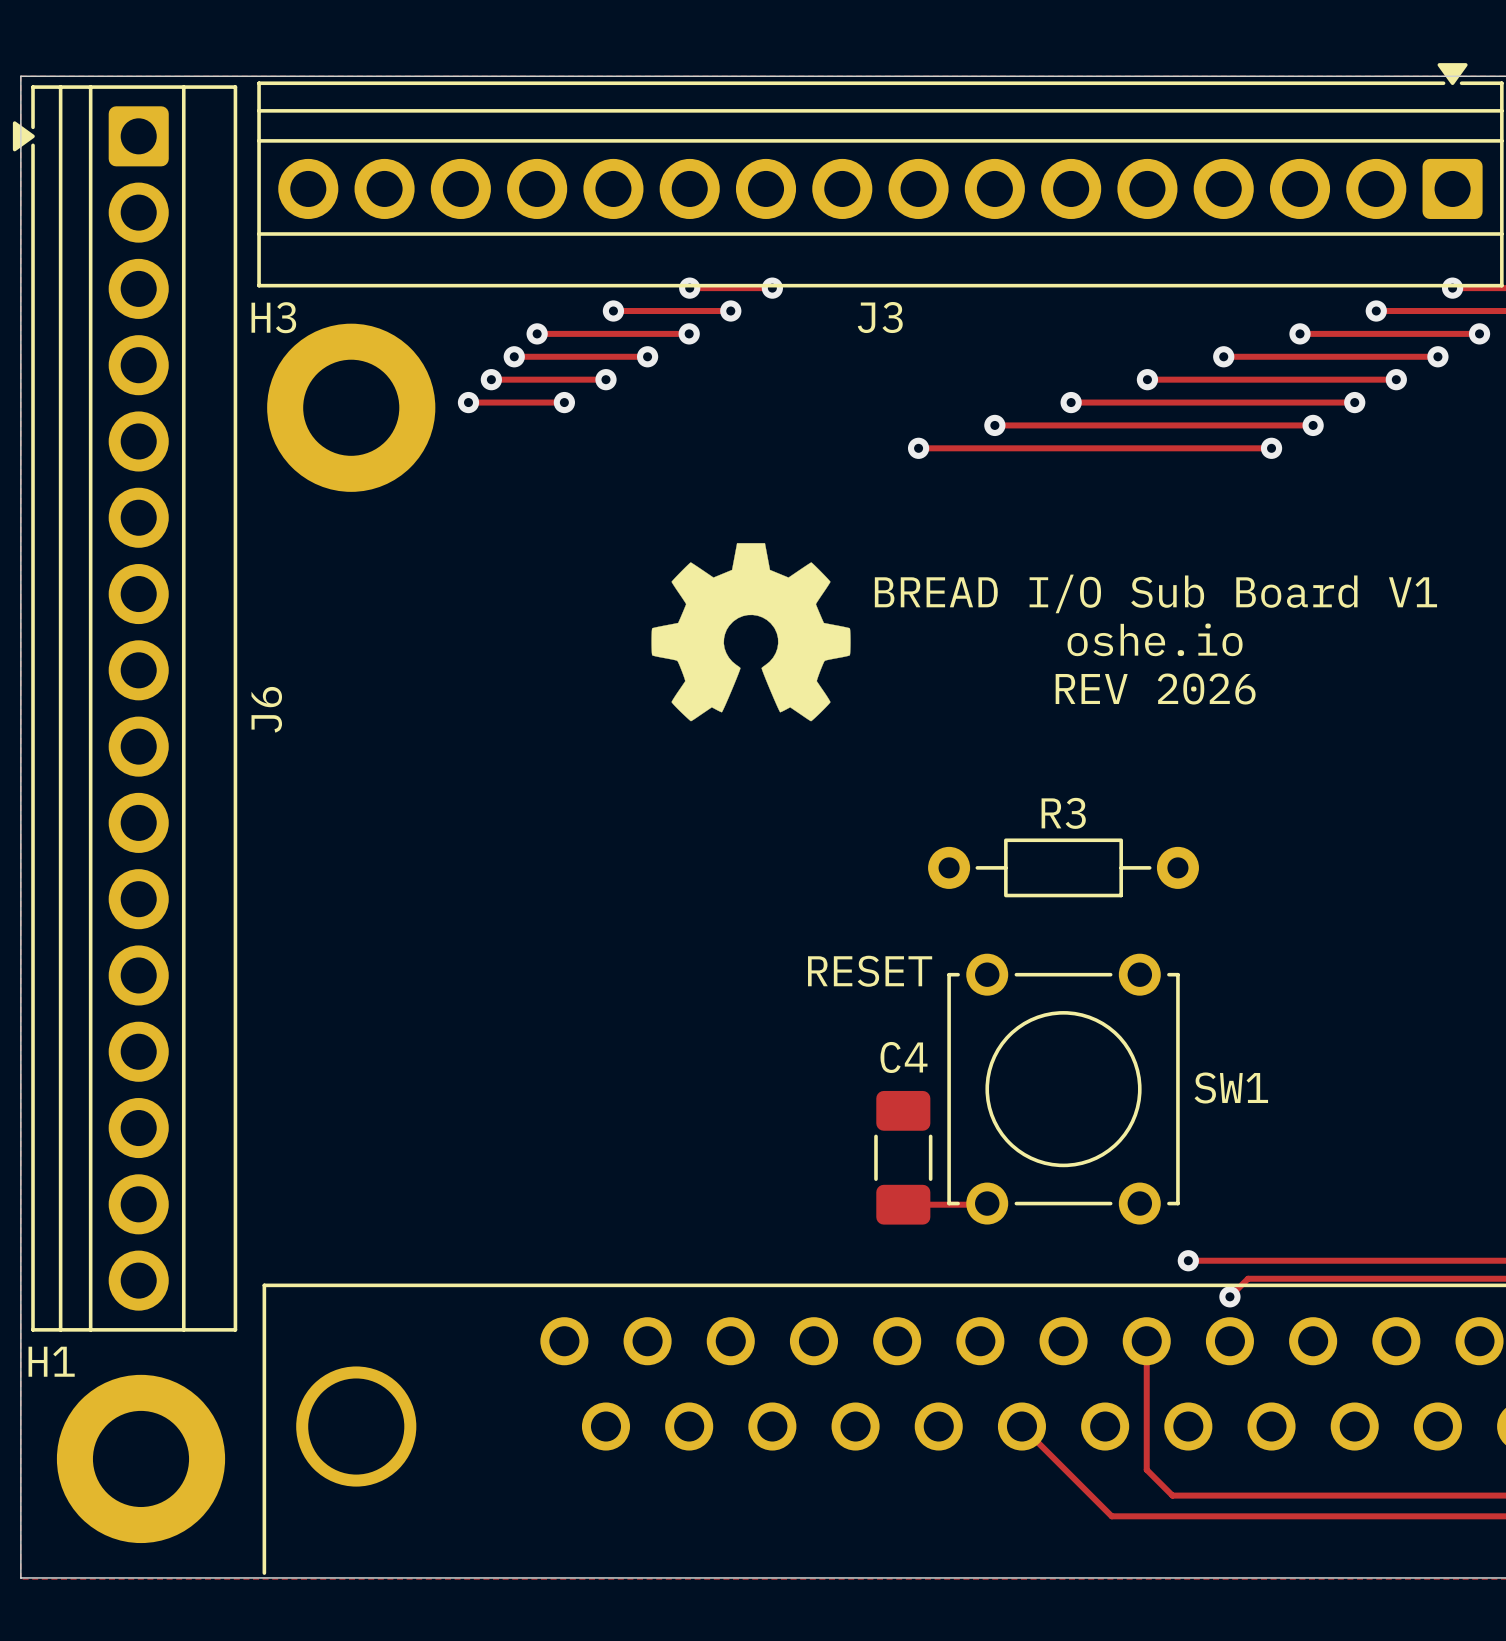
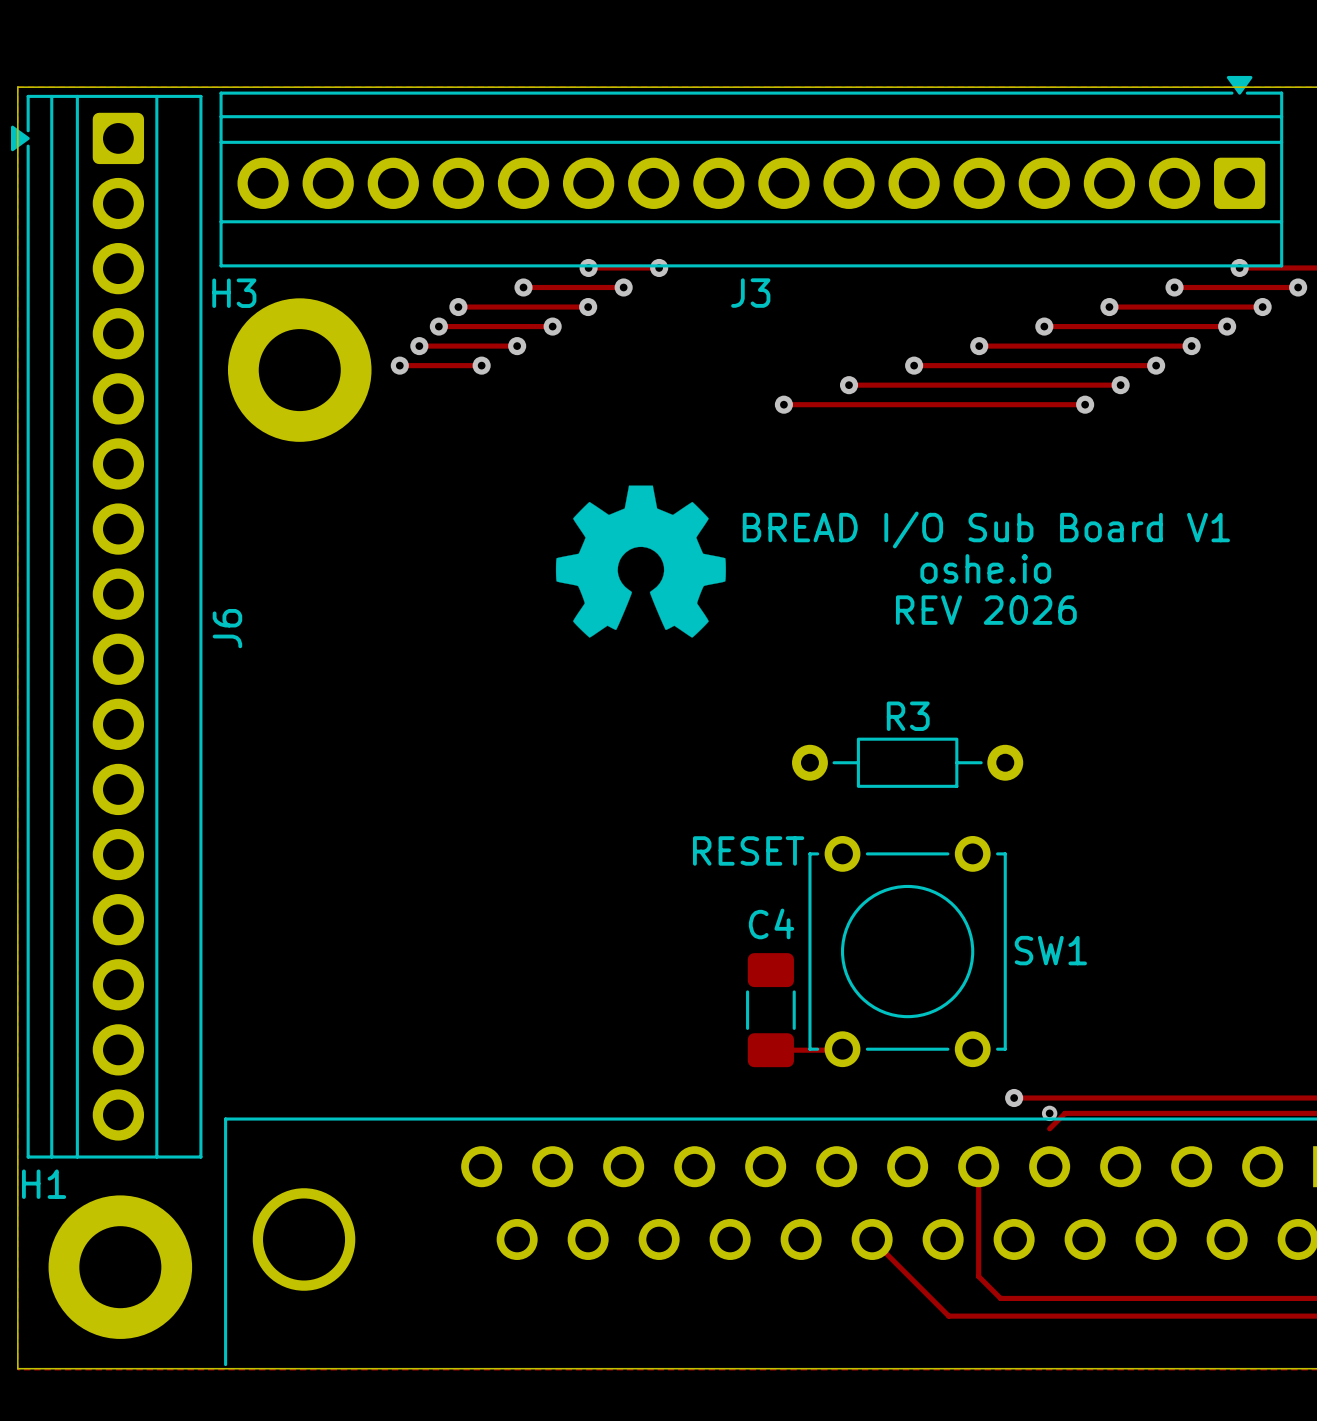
via position: (1229, 1296) -> (1049, 1113)

